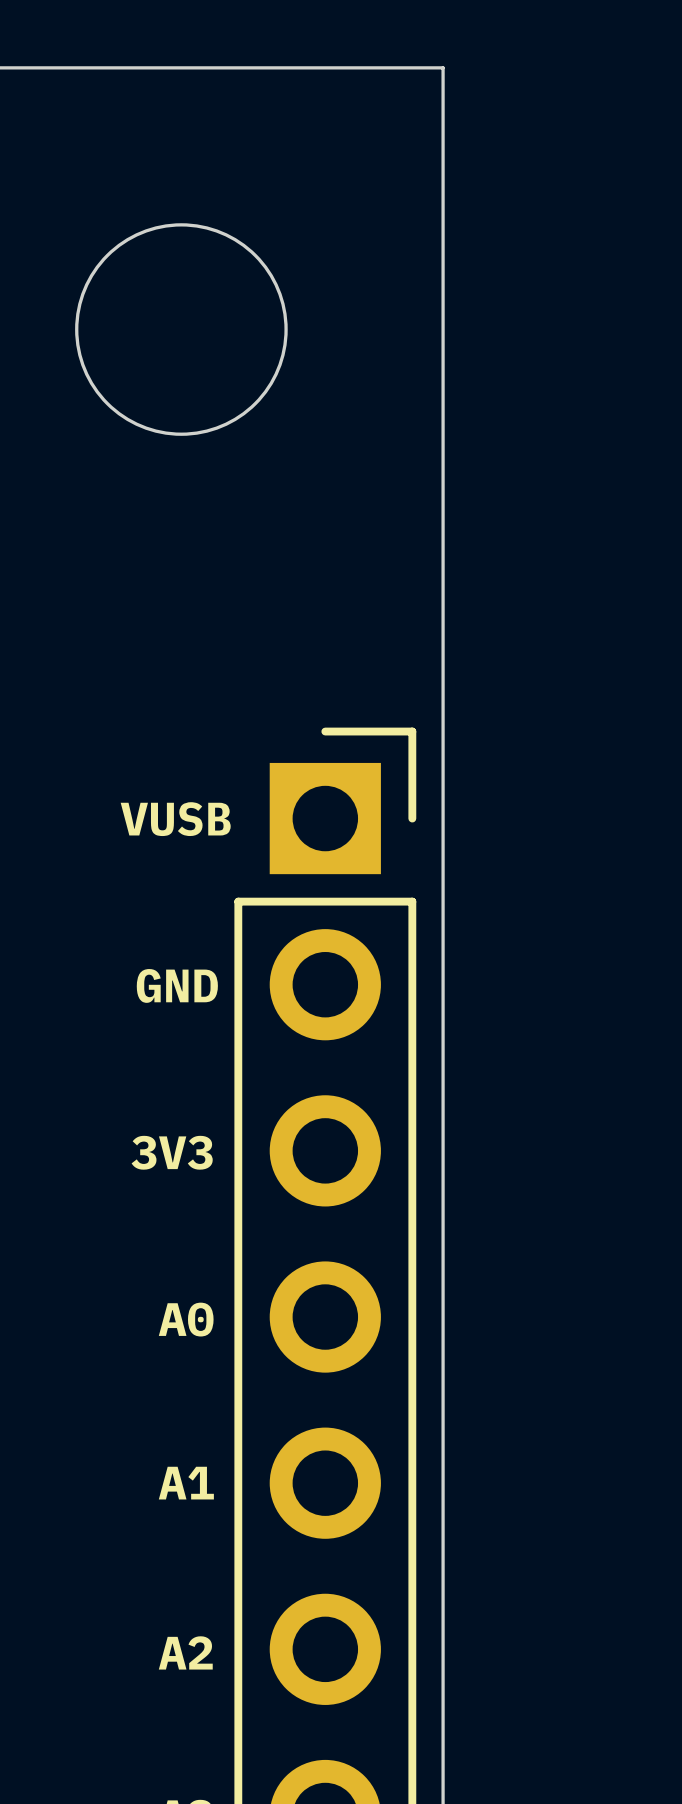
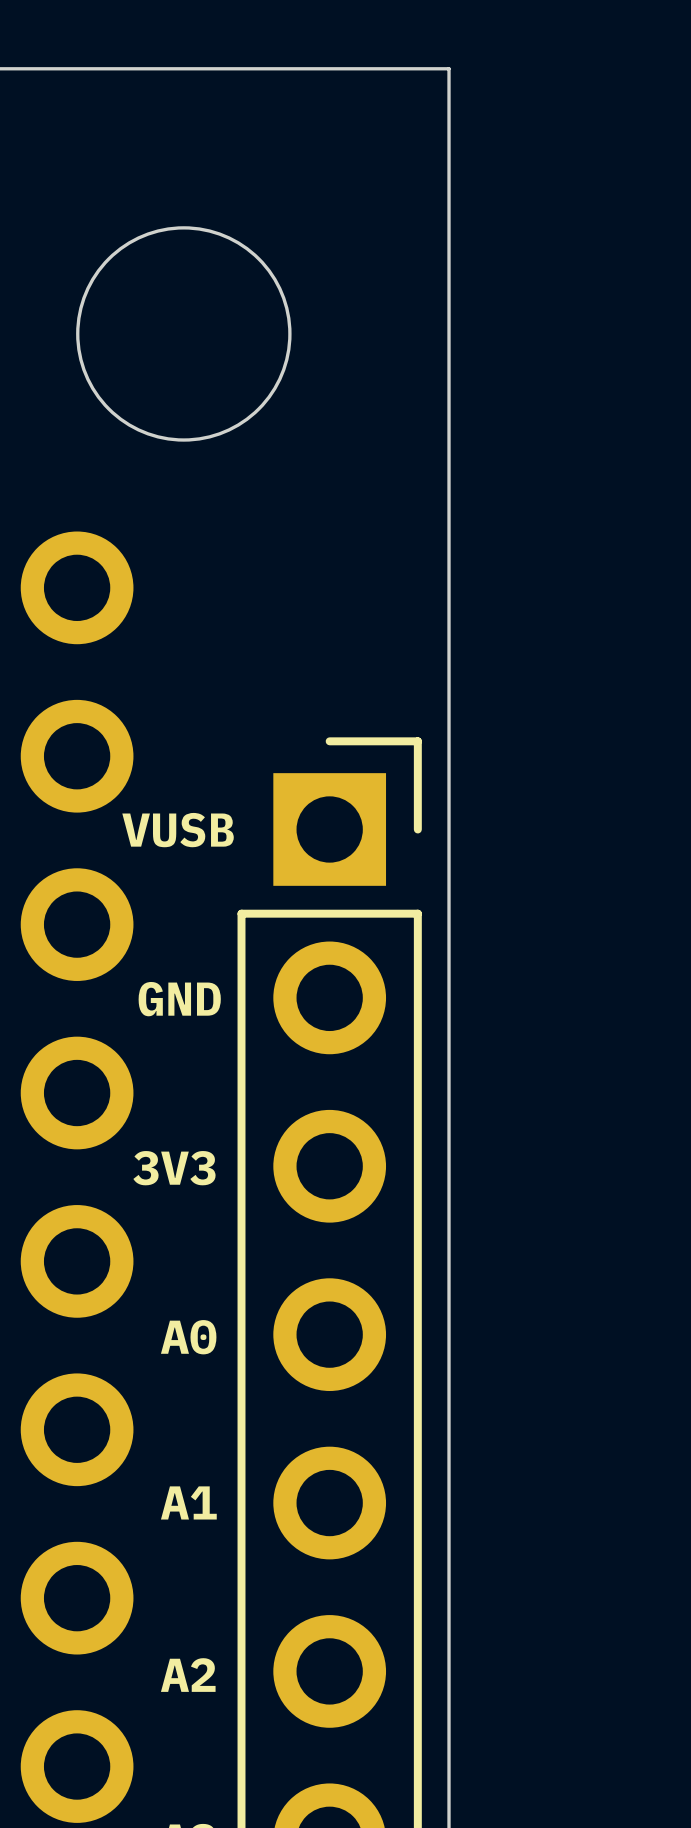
part: none -> (77, 587)
part: none -> (77, 756)
part: none -> (77, 924)
part: none -> (77, 1093)
part: none -> (77, 1261)
part: none -> (77, 1429)
part: none -> (77, 1598)
part: none -> (77, 1766)

